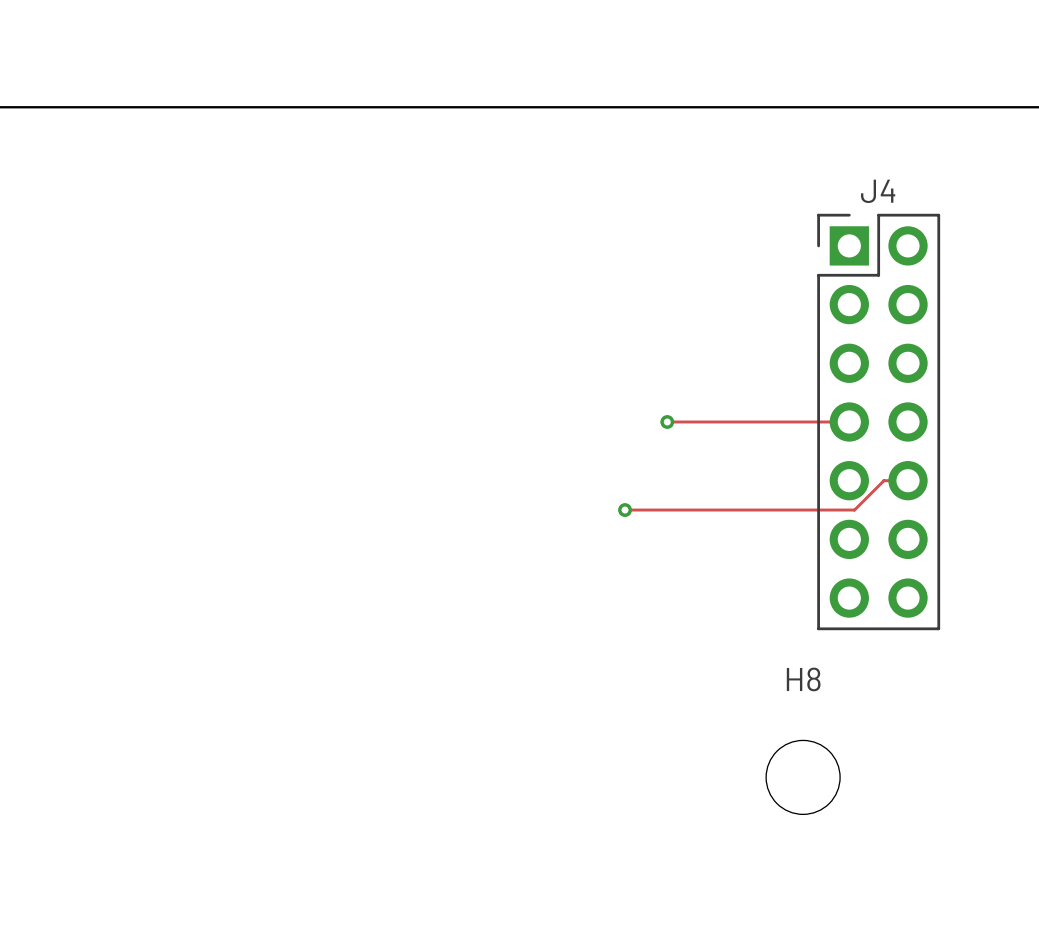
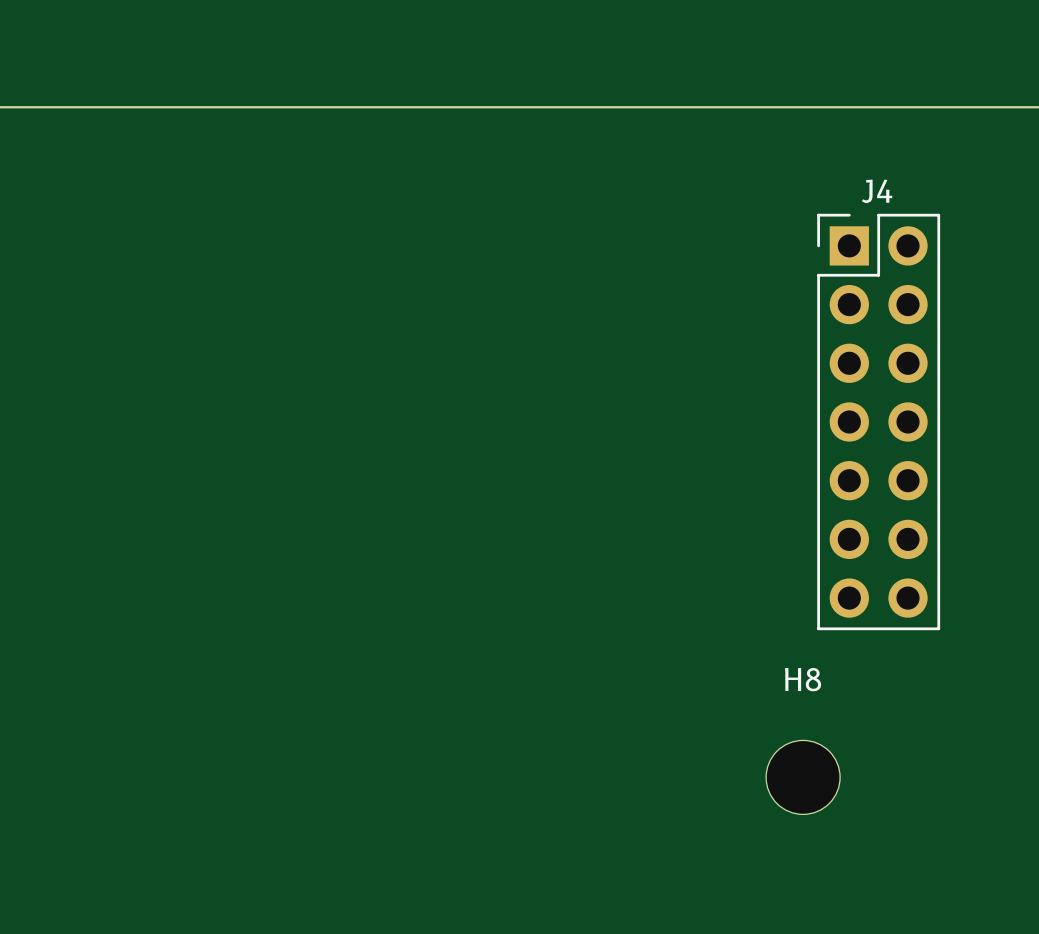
track: (667, 421) (849, 421) -> none
via: (667, 421) -> none
track: (908, 480) (883, 480) (854, 510) (625, 510) -> none
via: (625, 510) -> none

